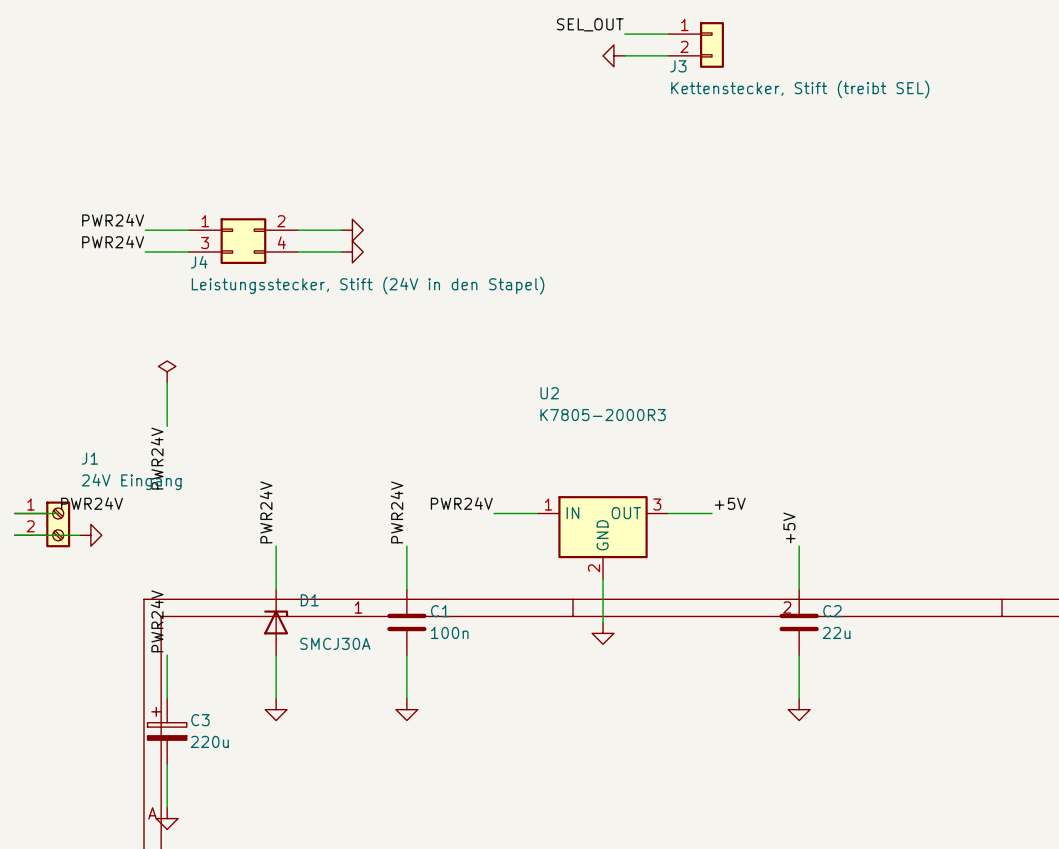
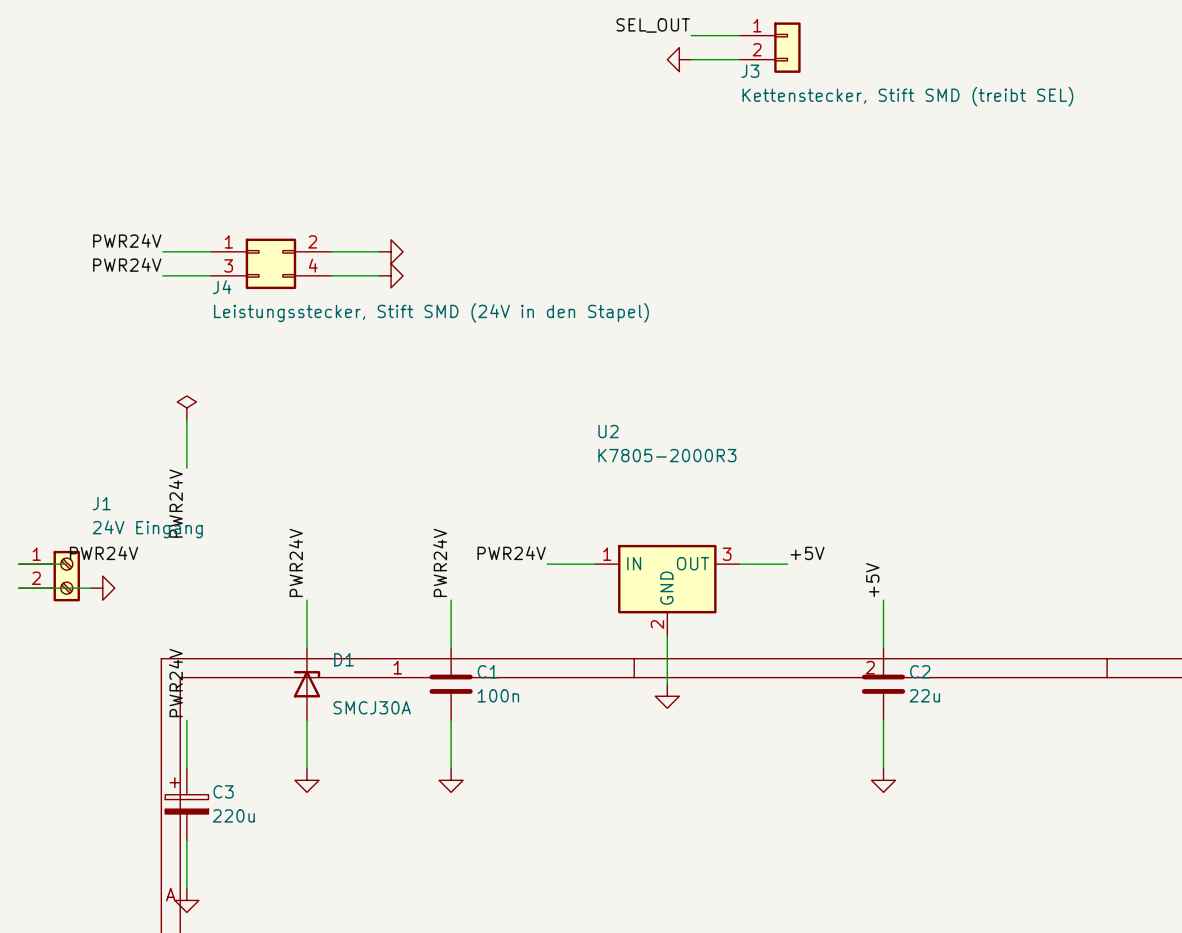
J3 value: Kettenstecker, Stift (treibt SEL) (800, 89) -> Kettenstecker, Stift SMD (treibt SEL) (907, 96)
J4 value: Leistungsstecker, Stift (24V in den Stapel) (368, 285) -> Leistungsstecker, Stift SMD (24V in den Stapel) (431, 312)

